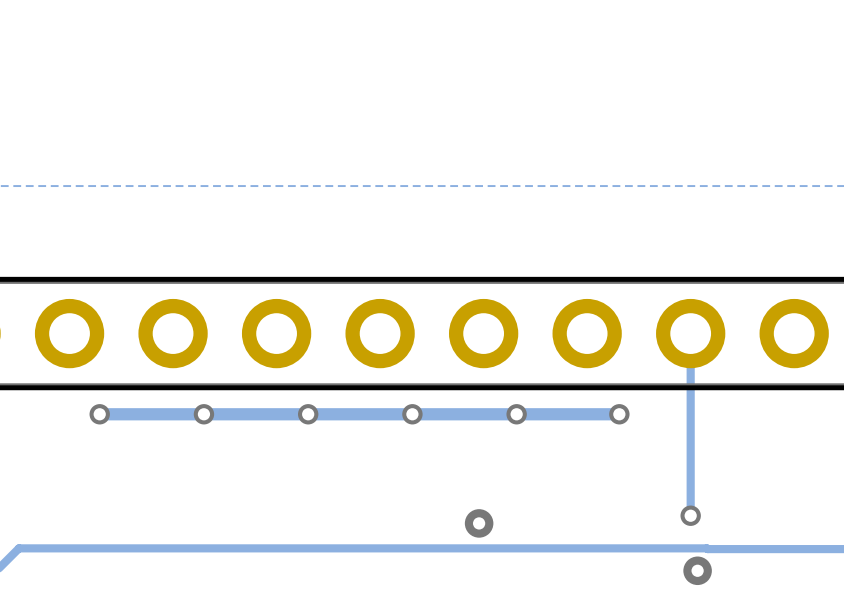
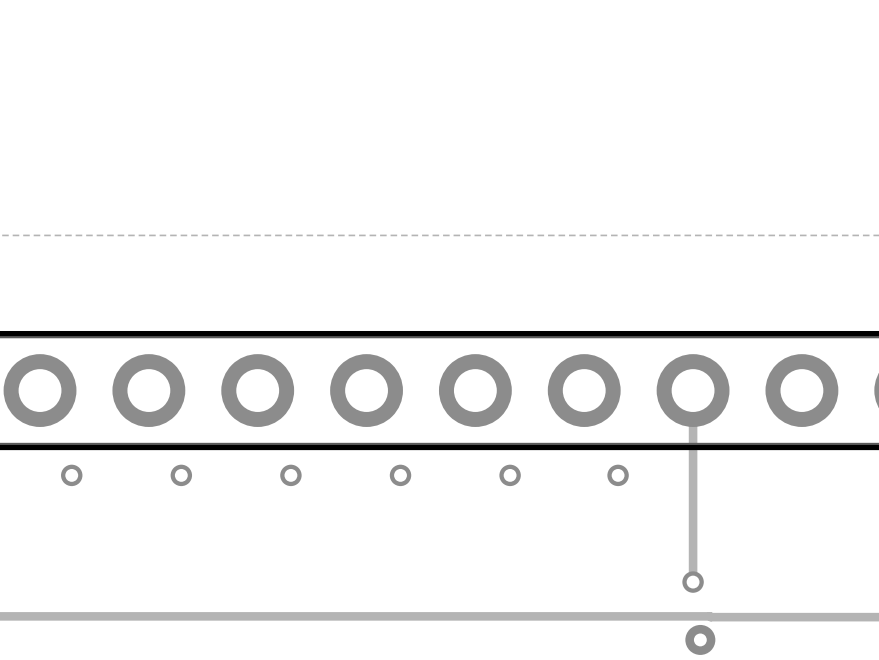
track: (619, 414) (99, 414) -> none
via: (479, 523) -> none

